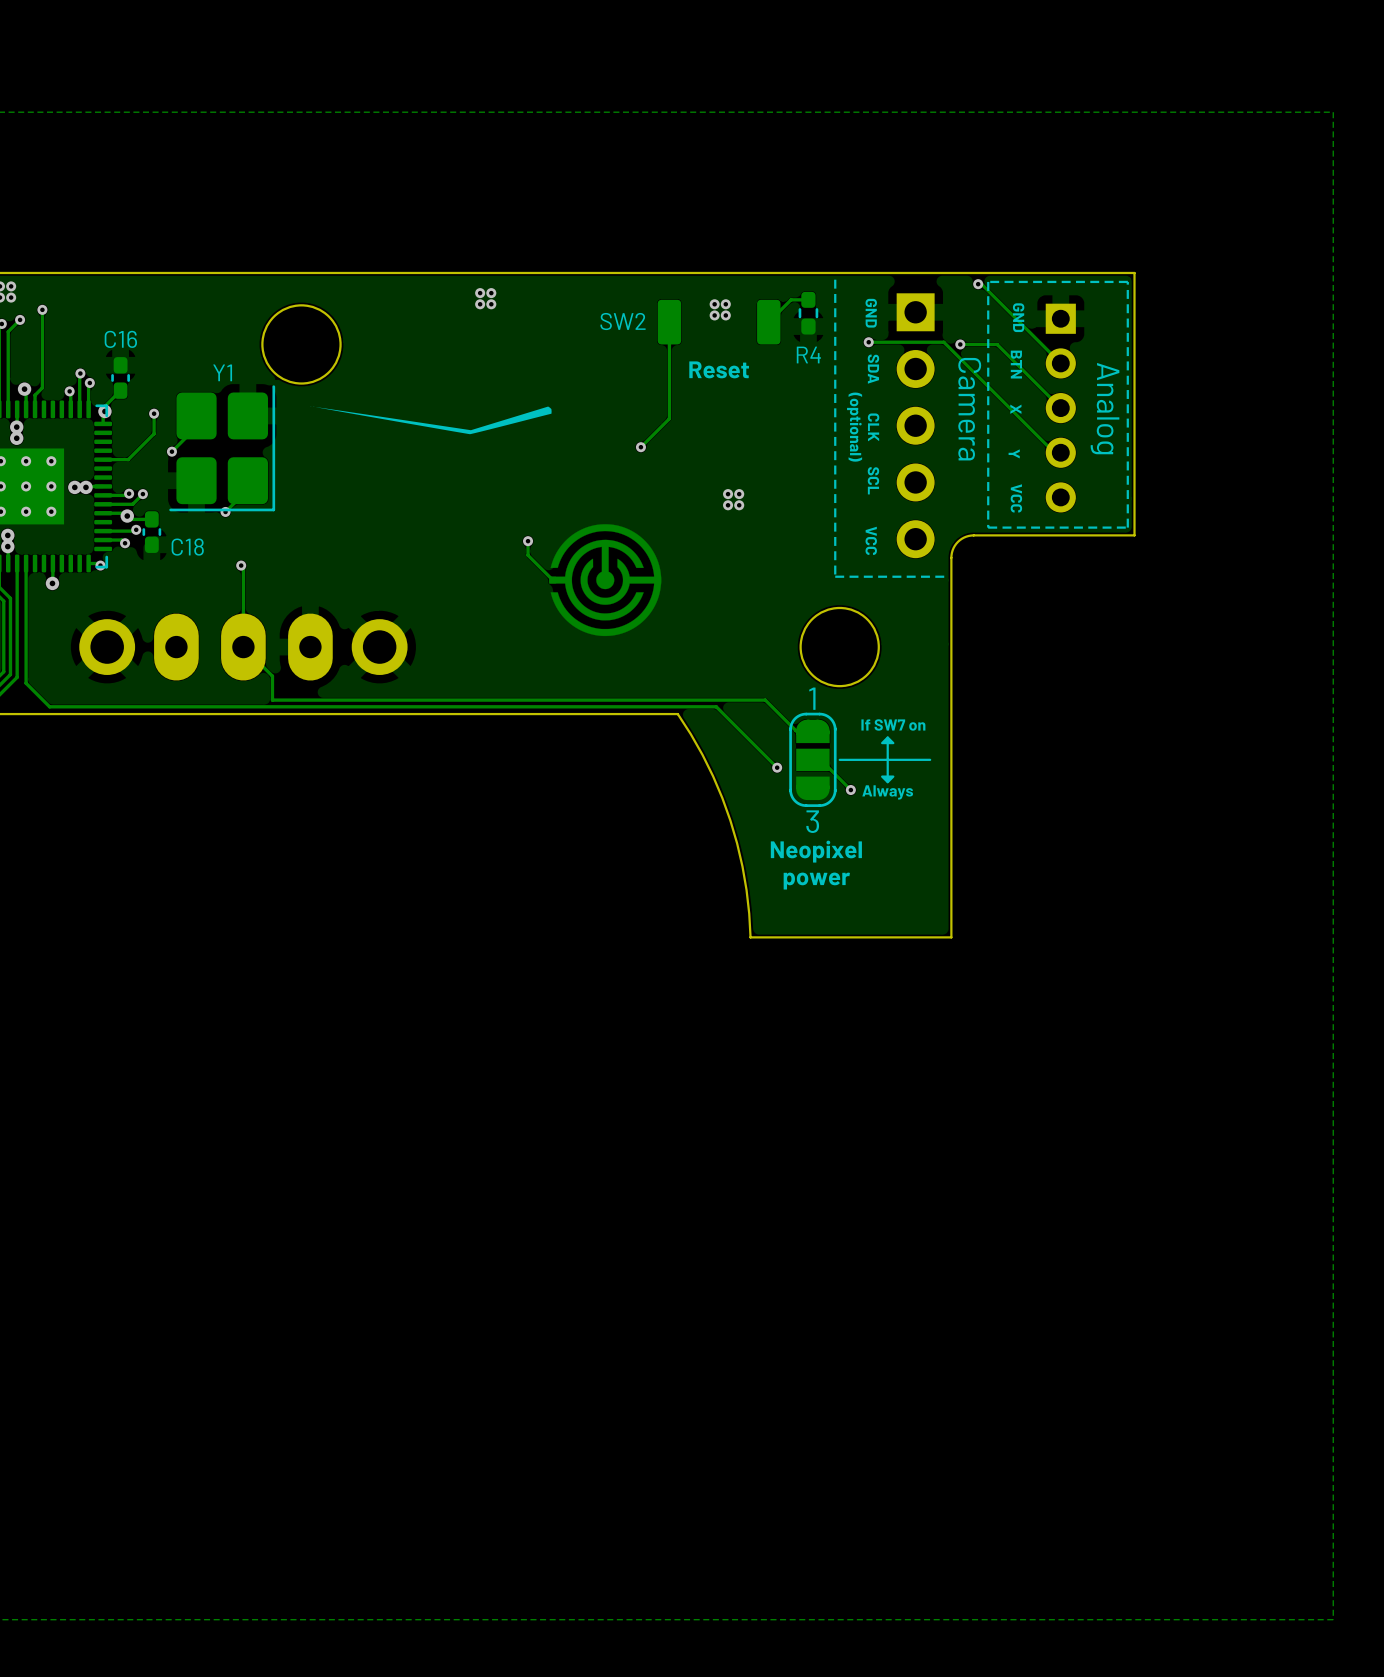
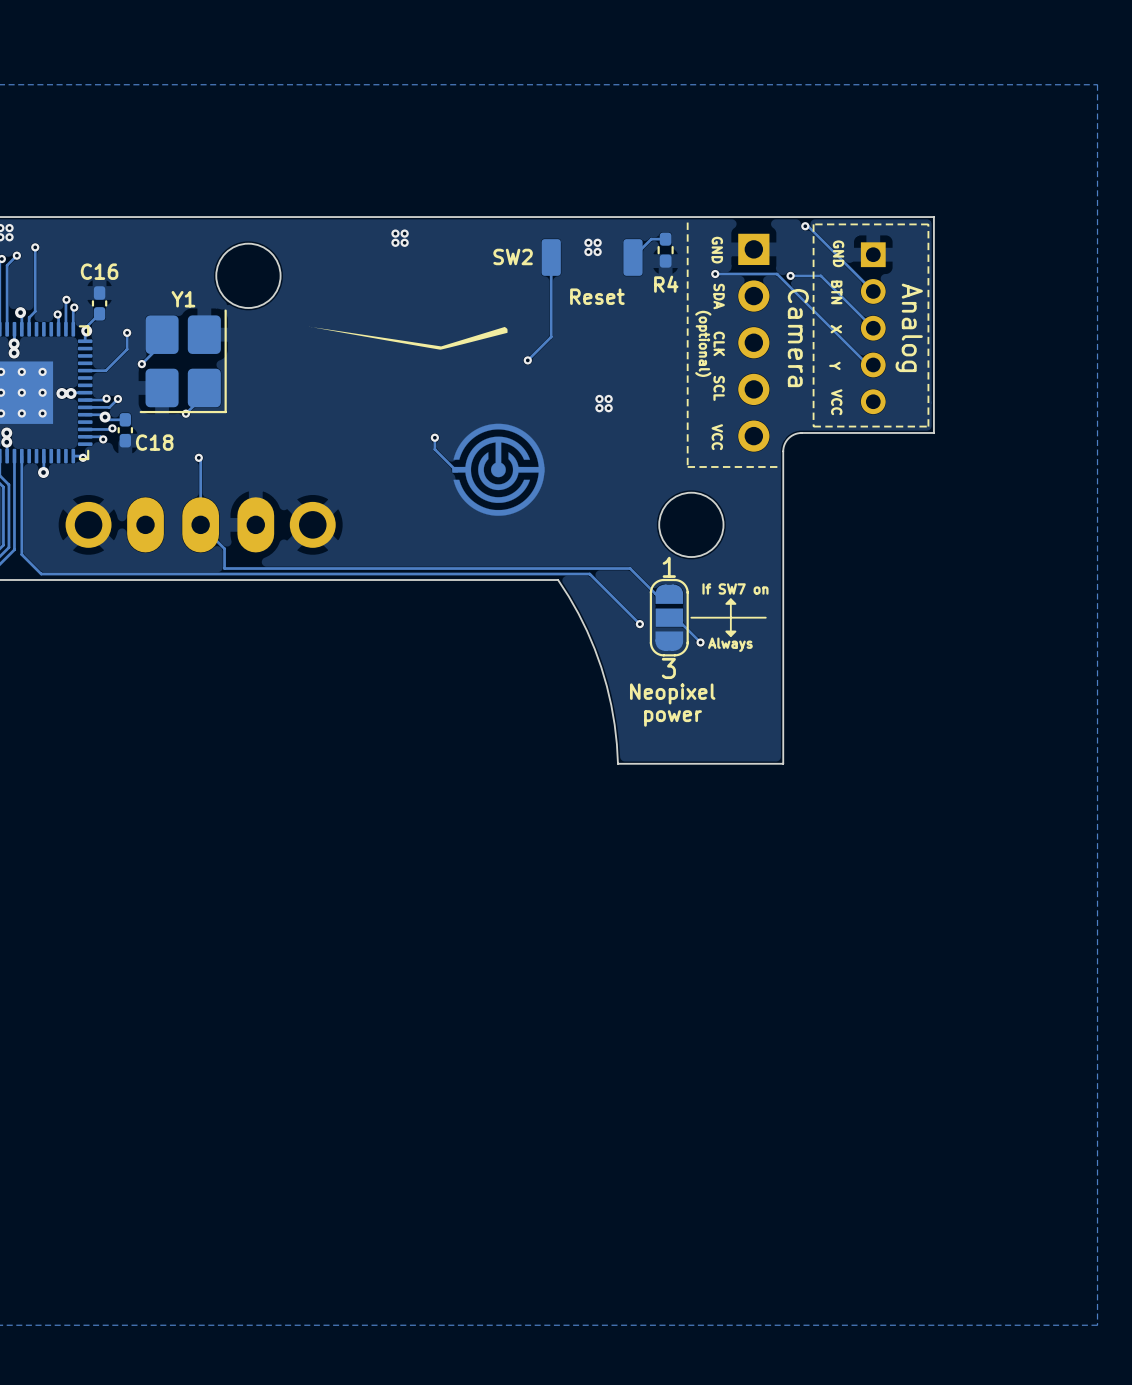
drawing position: (430, 420) -> (408, 338)

